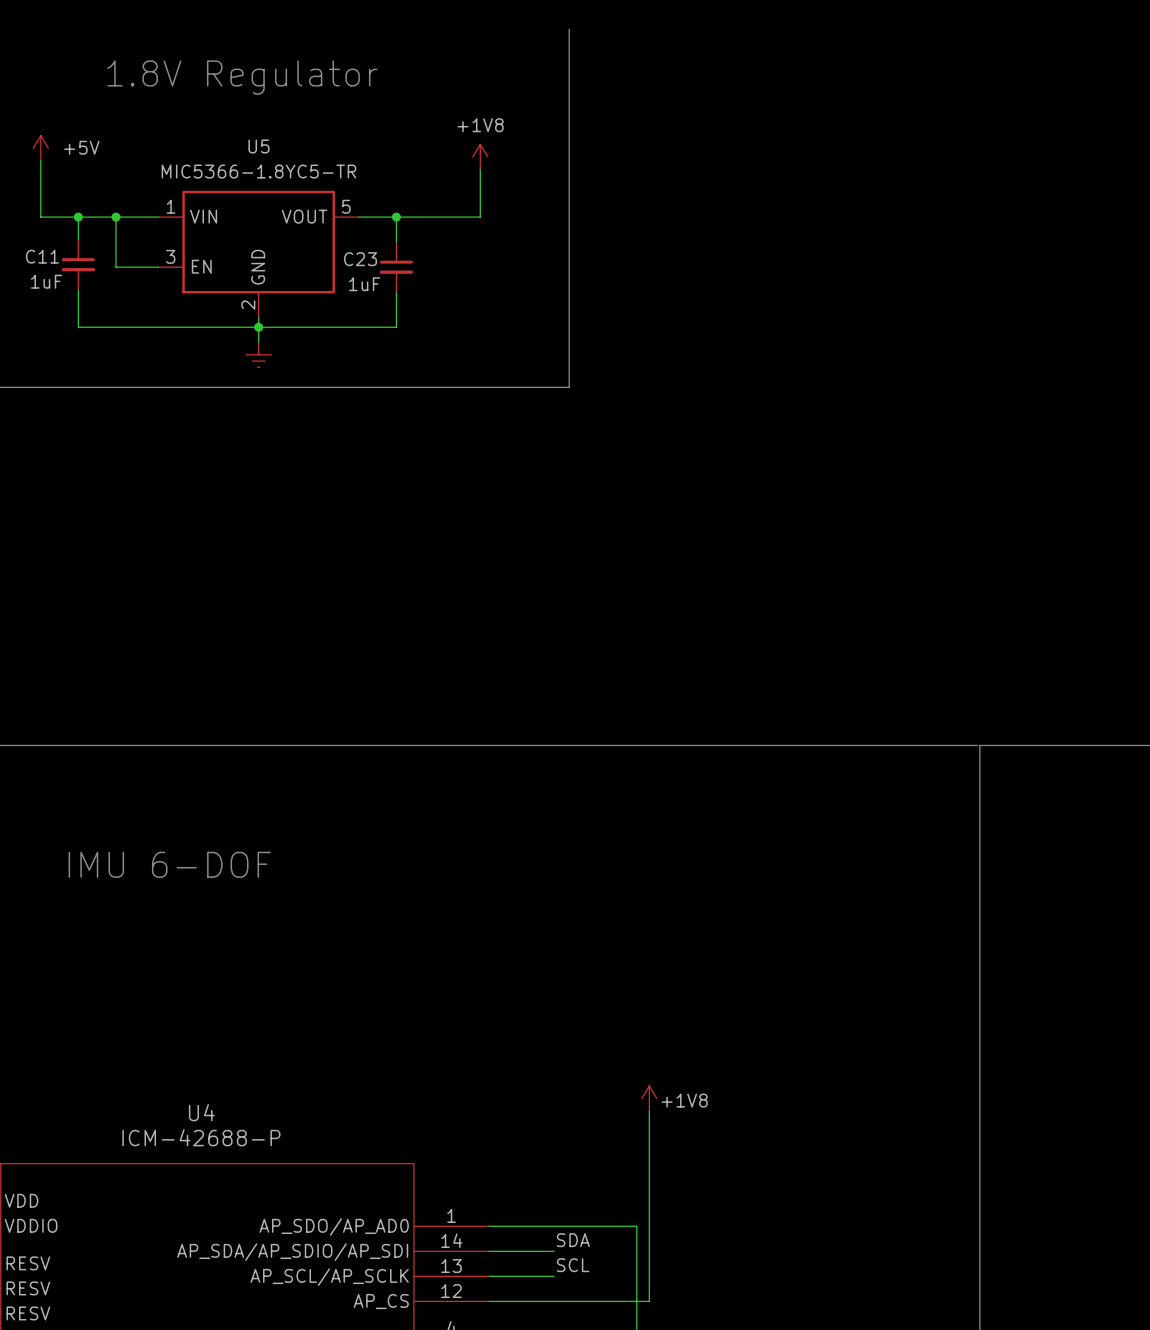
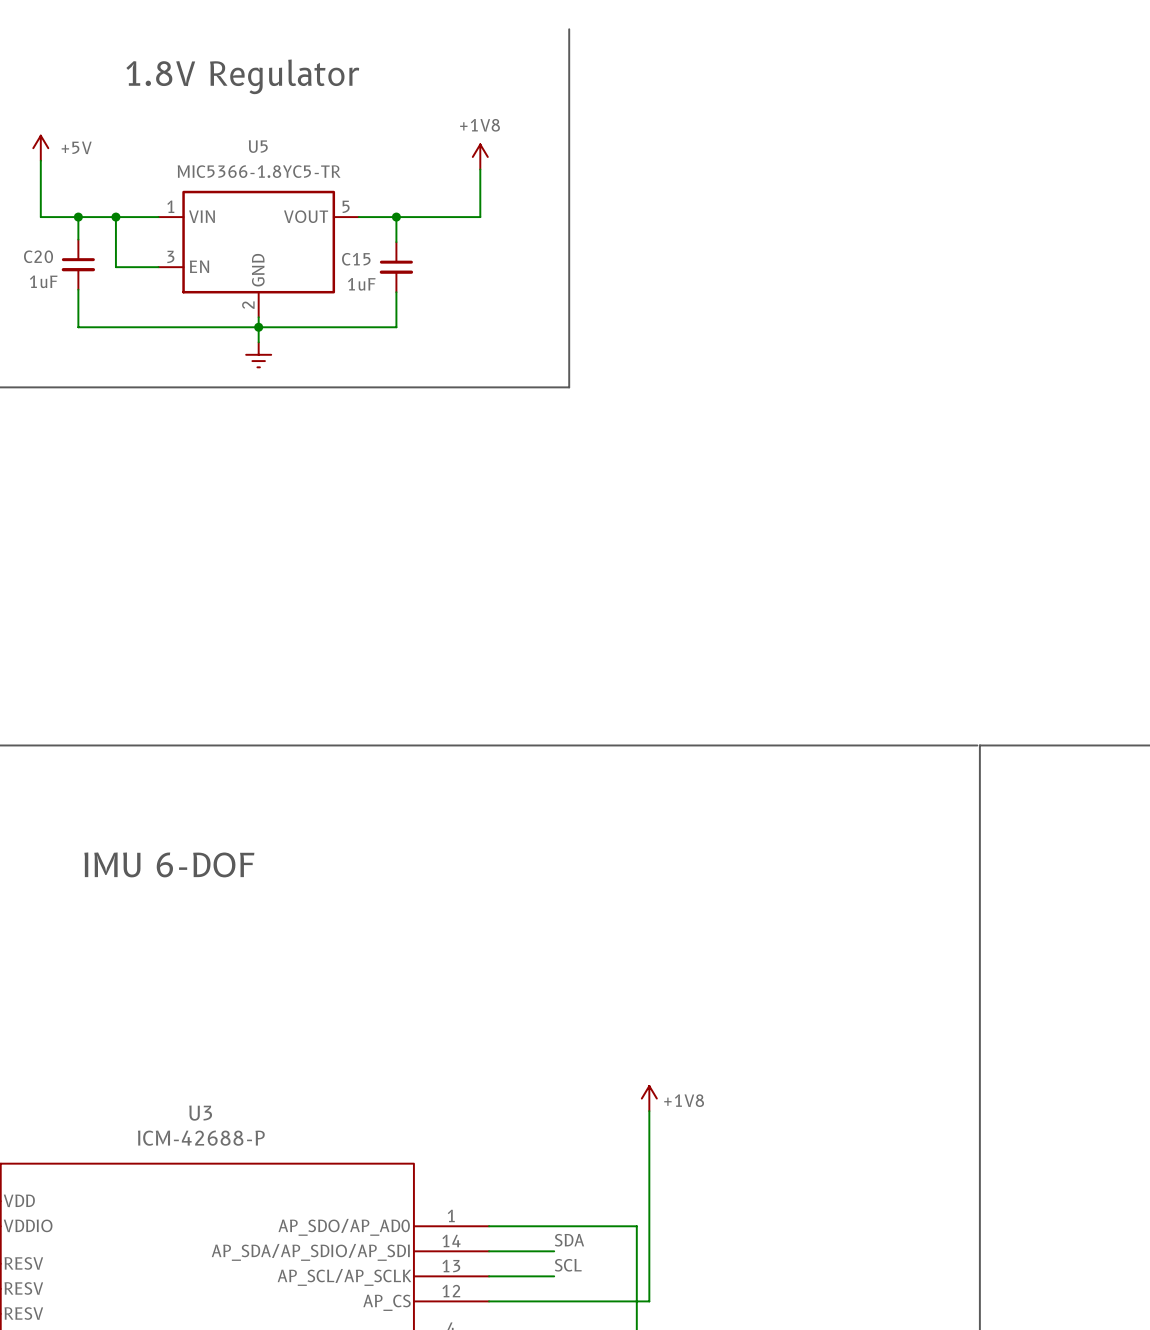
C11 name: C11 (42, 256) -> C20 (38, 256)
C23 name: C23 (360, 259) -> C15 (356, 259)
U4 name: U4 (201, 1112) -> U3 (200, 1113)

